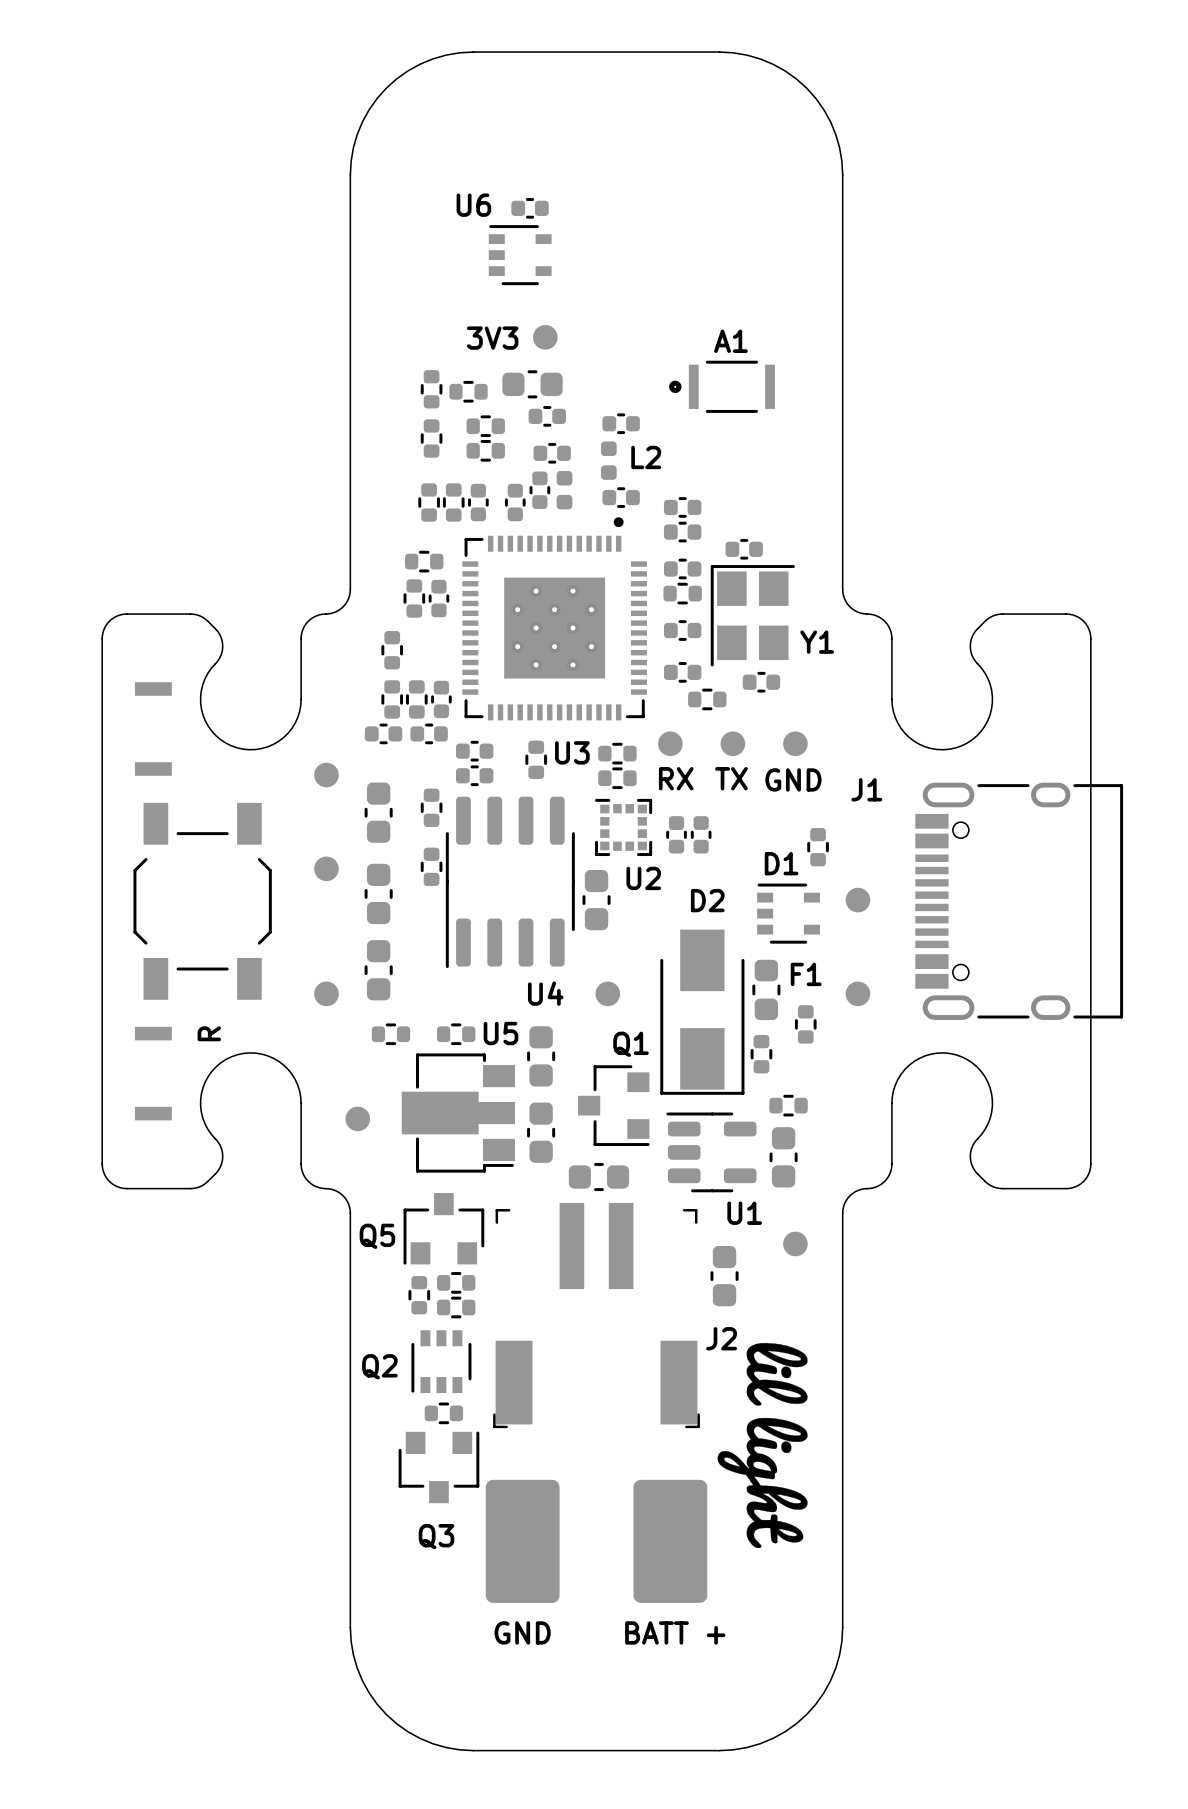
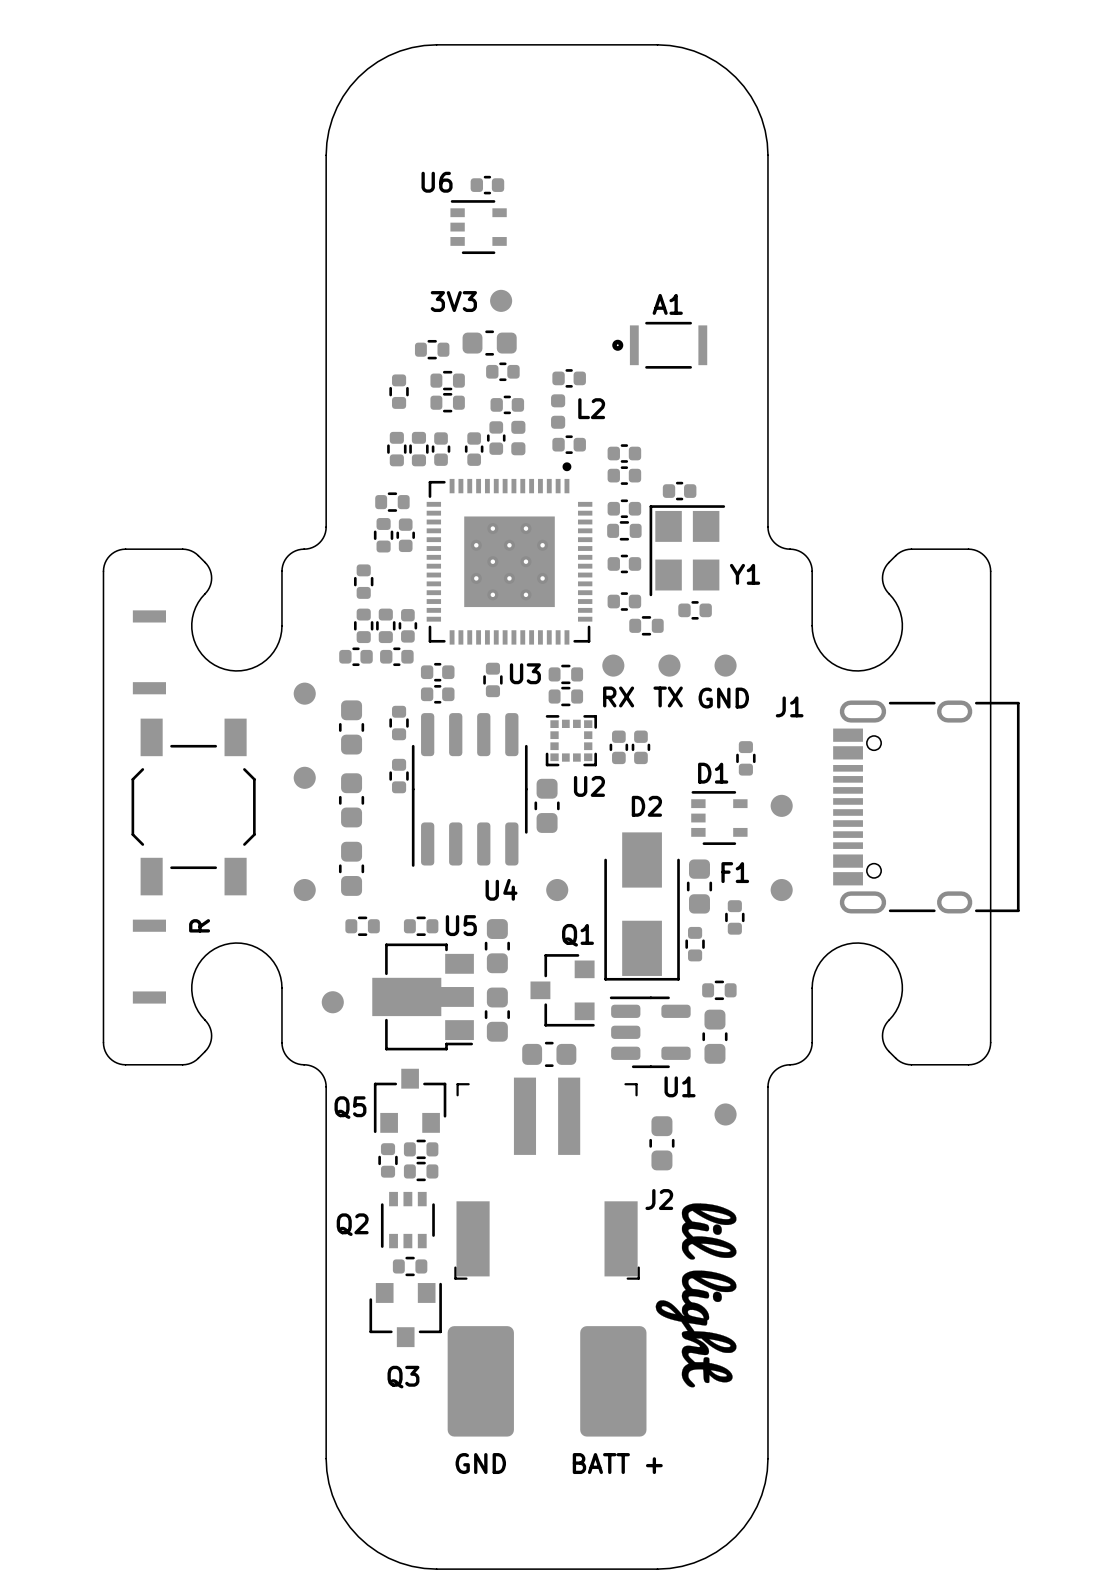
part: (431, 389) -> none

